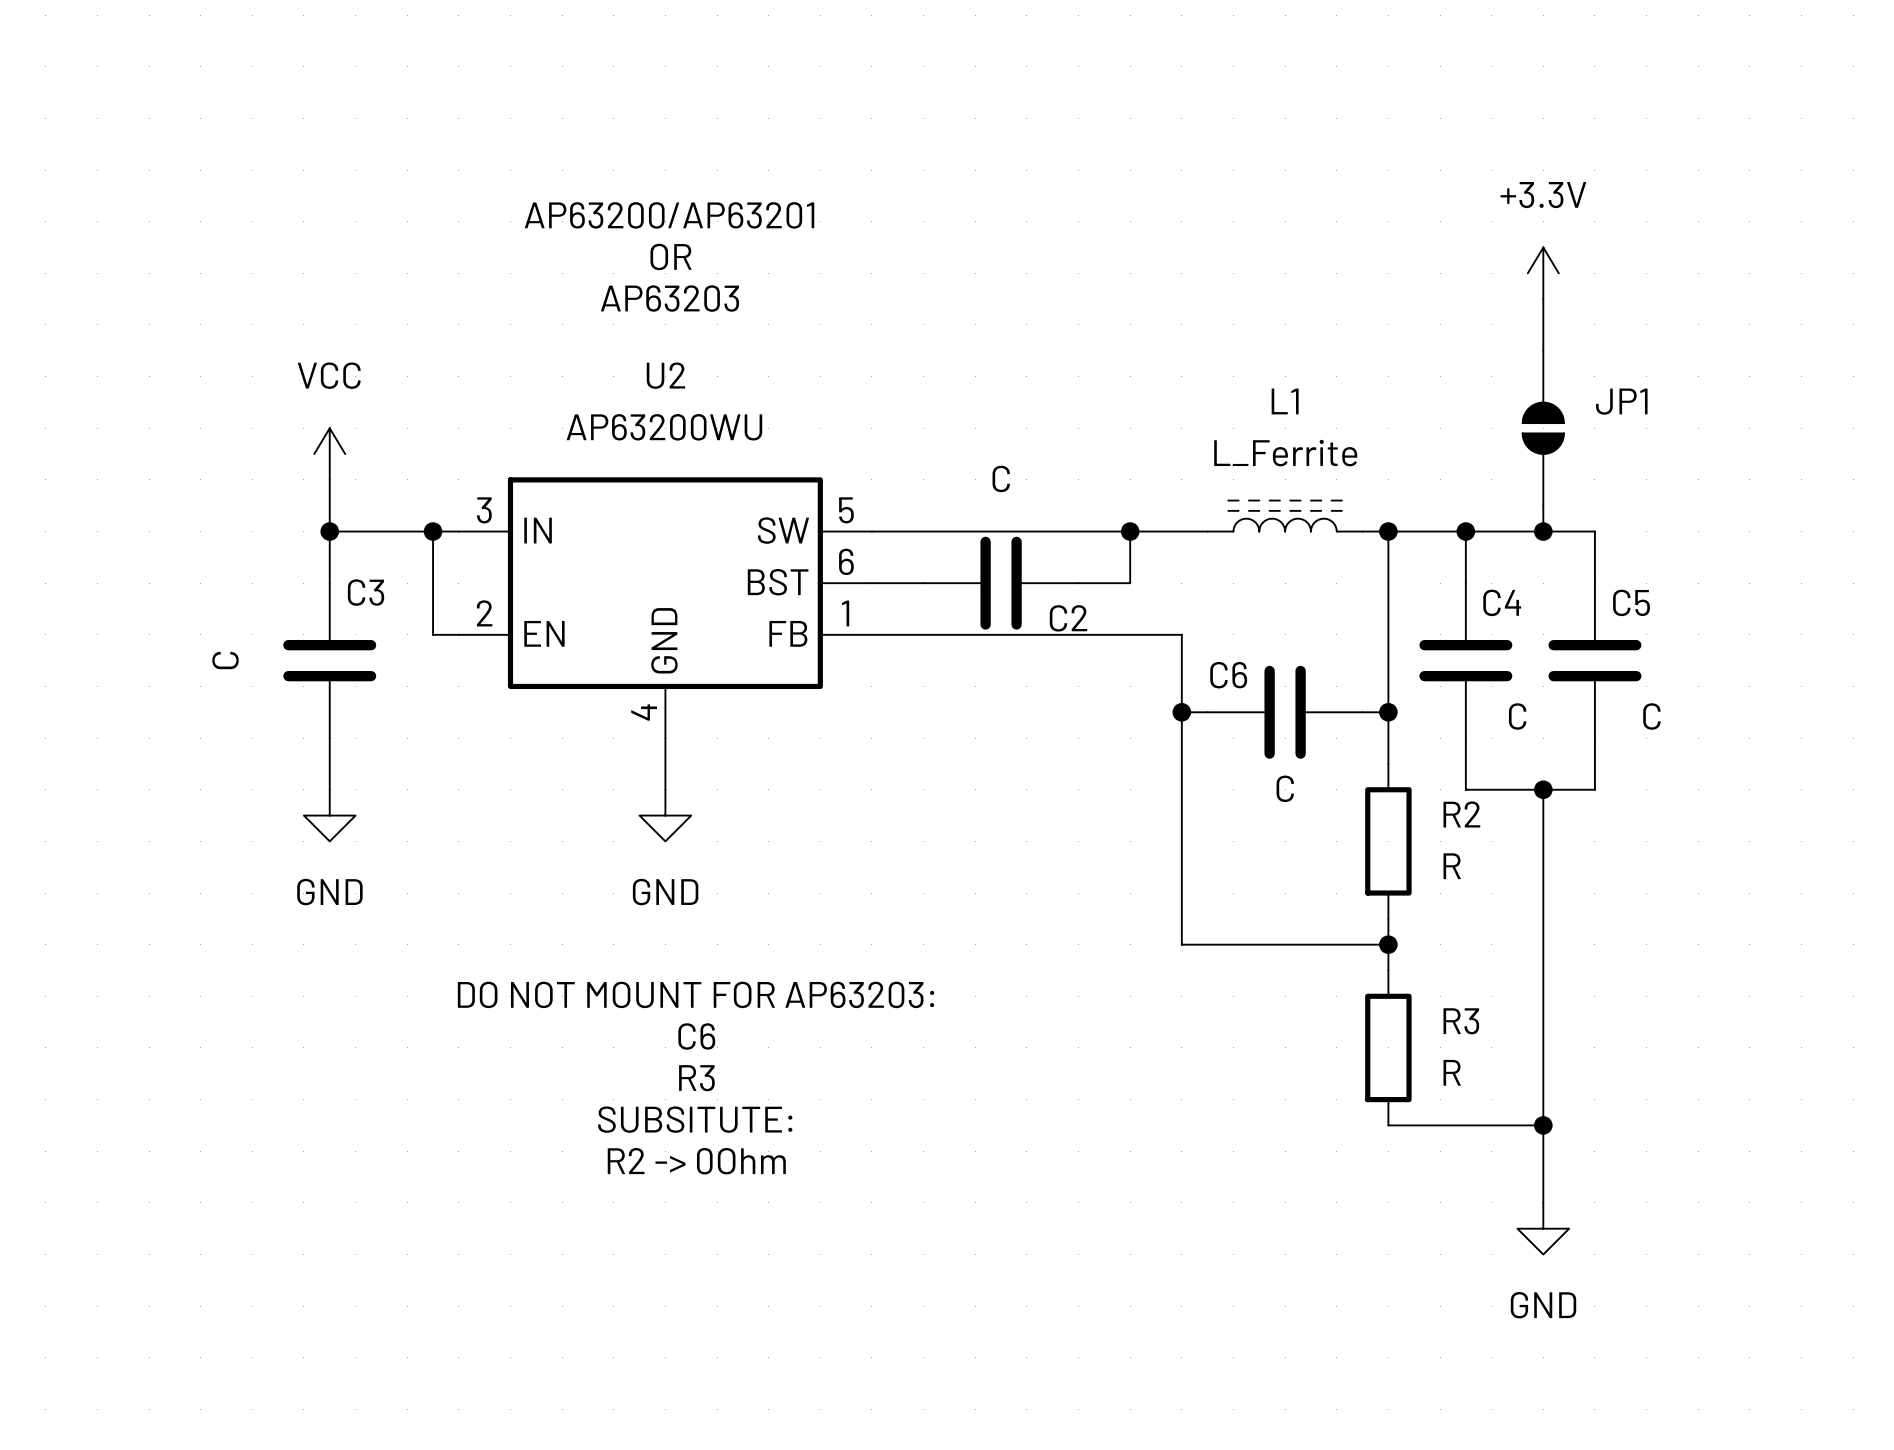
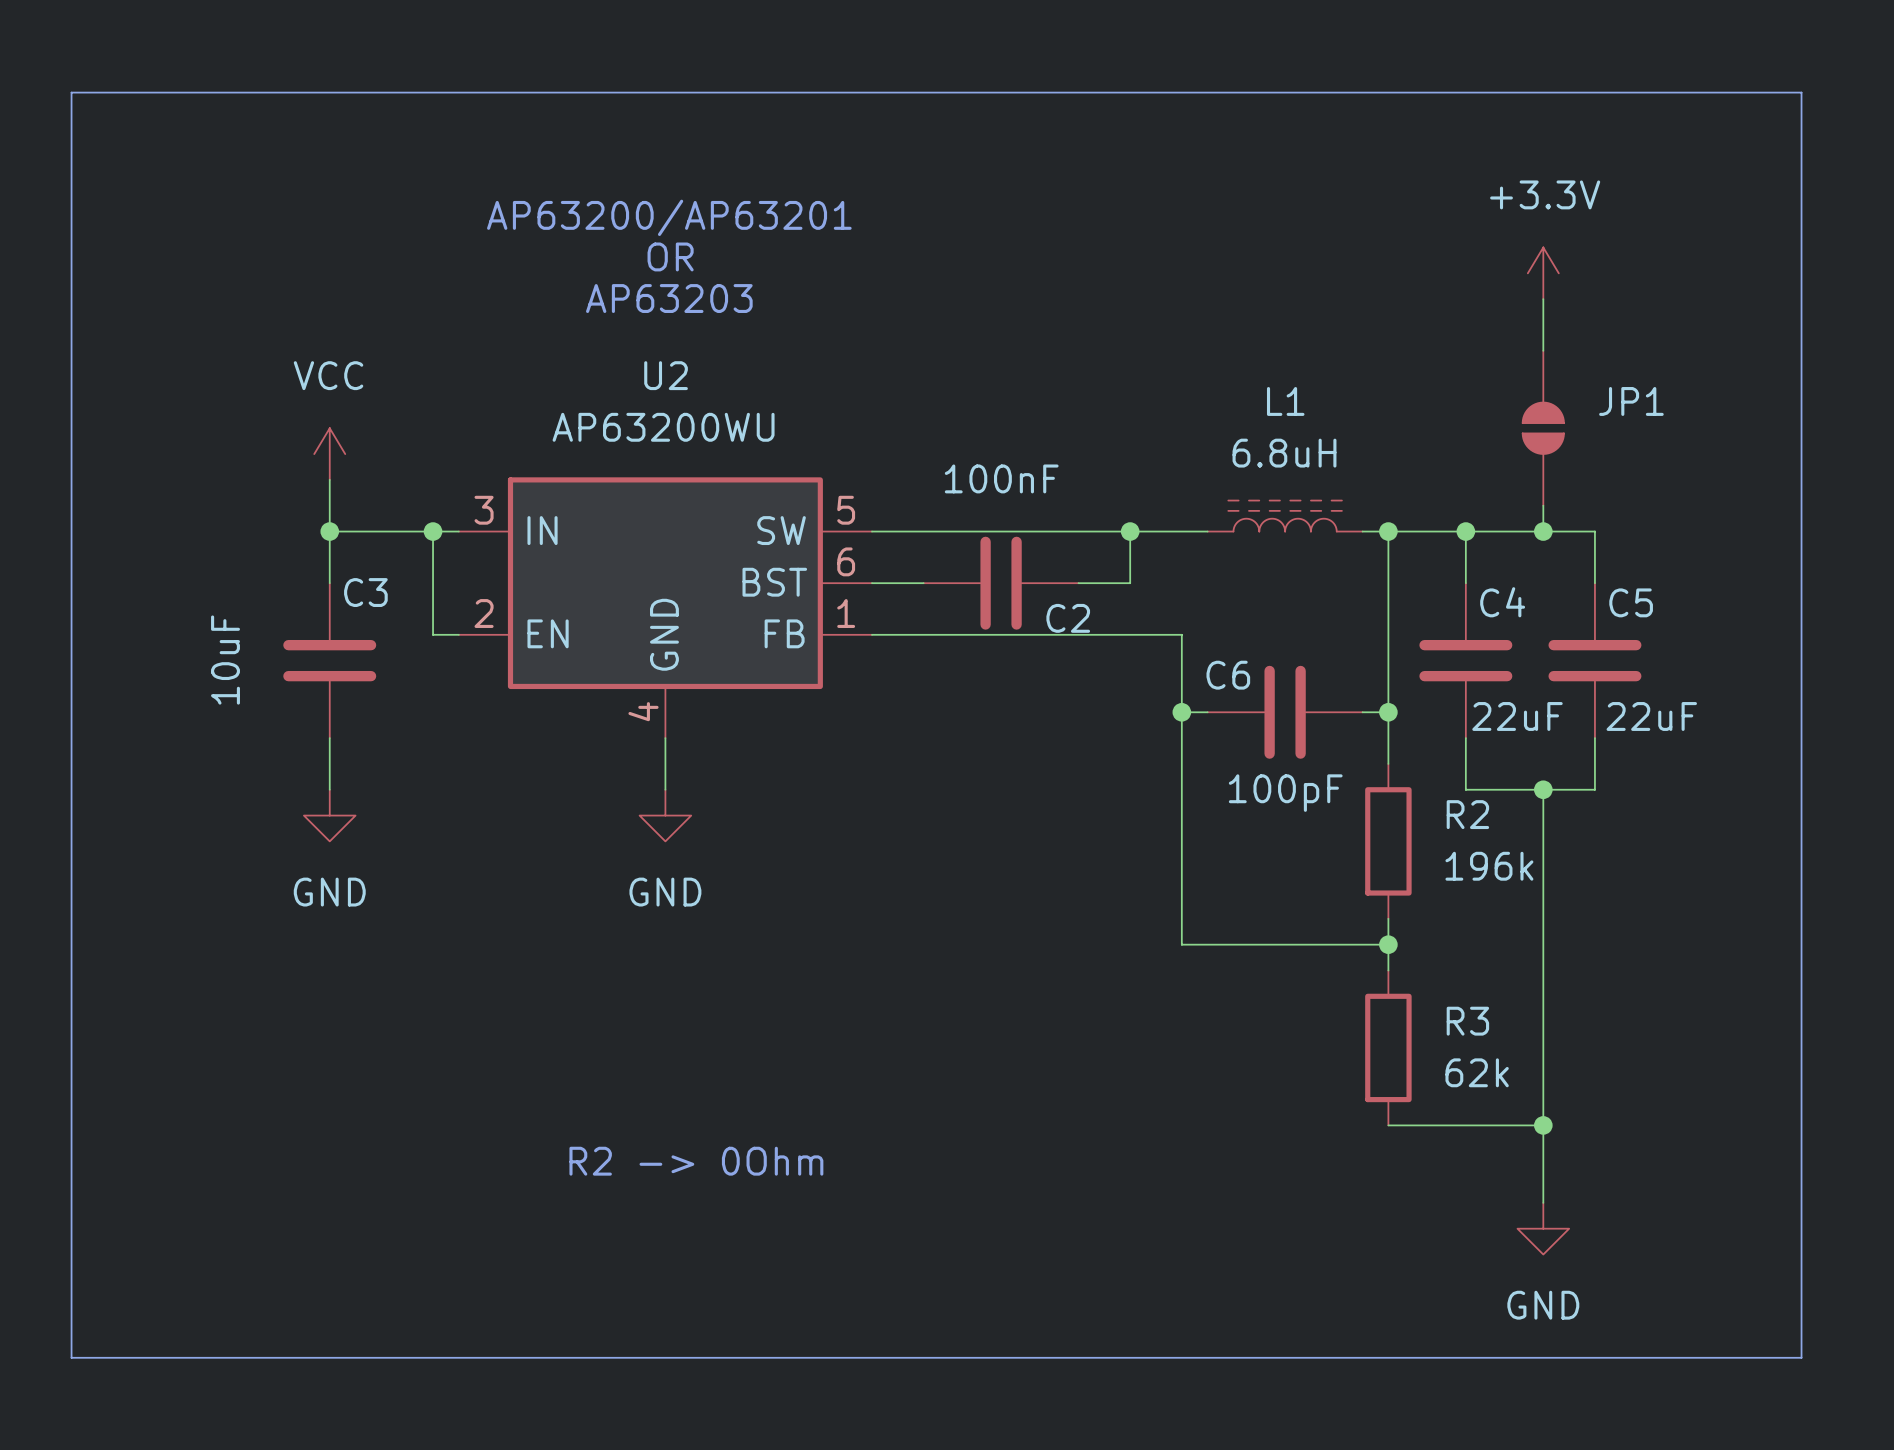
line: none -> (71, 92) (1801, 92) (1801, 1357) (71, 1357) (71, 92)
L1 value: L_Ferrite (1285, 453) -> 6.8uH (1284, 453)
C2 value: C (1001, 478) -> 100nF (1001, 478)
C3 value: C (225, 660) -> 10uF (225, 660)
C4 value: C (1517, 716) -> 22uF (1517, 716)
C5 value: C (1651, 716) -> 22uF (1651, 716)
C6 value: C (1285, 788) -> 100pF (1285, 793)
R2 value: R (1452, 866) -> 196k (1489, 866)
text: DO NOT MOUNT FOR AP63203: (696, 994) -> none
text: C6 (696, 1036) -> none
R3 value: R (1452, 1072) -> 62k (1477, 1072)
text: R3 (696, 1078) -> none
text: SUBSITUTE: (695, 1119) -> none

